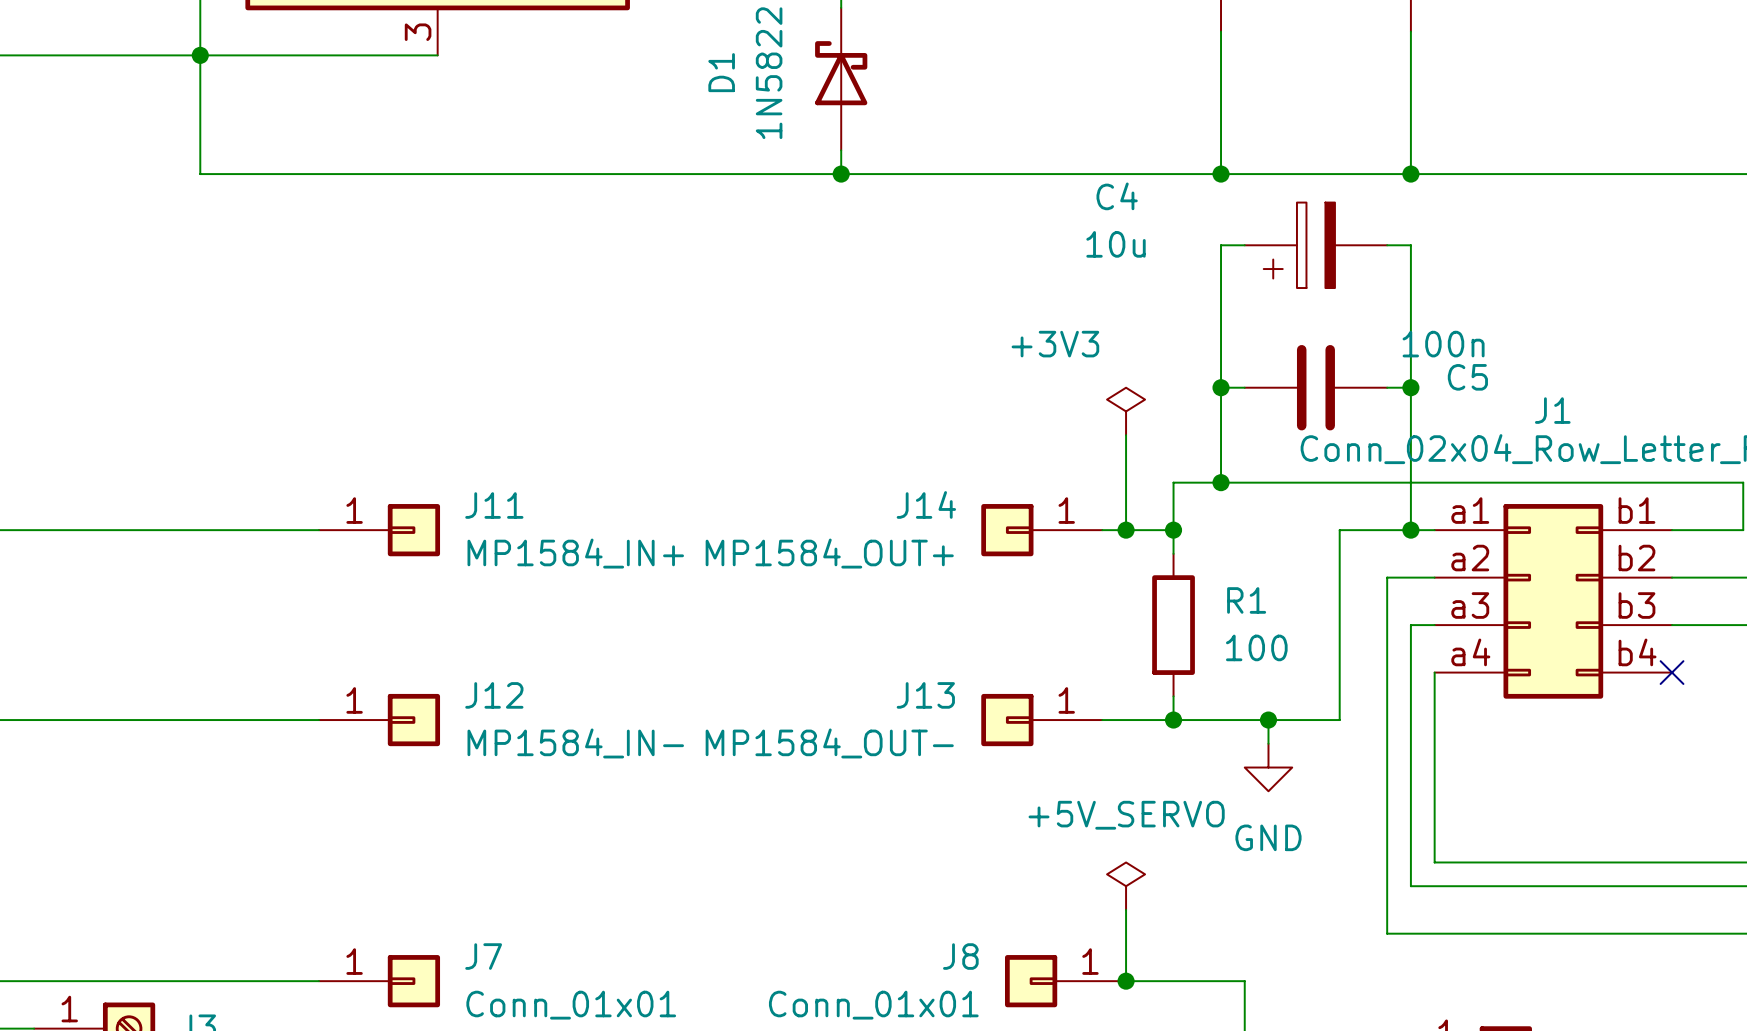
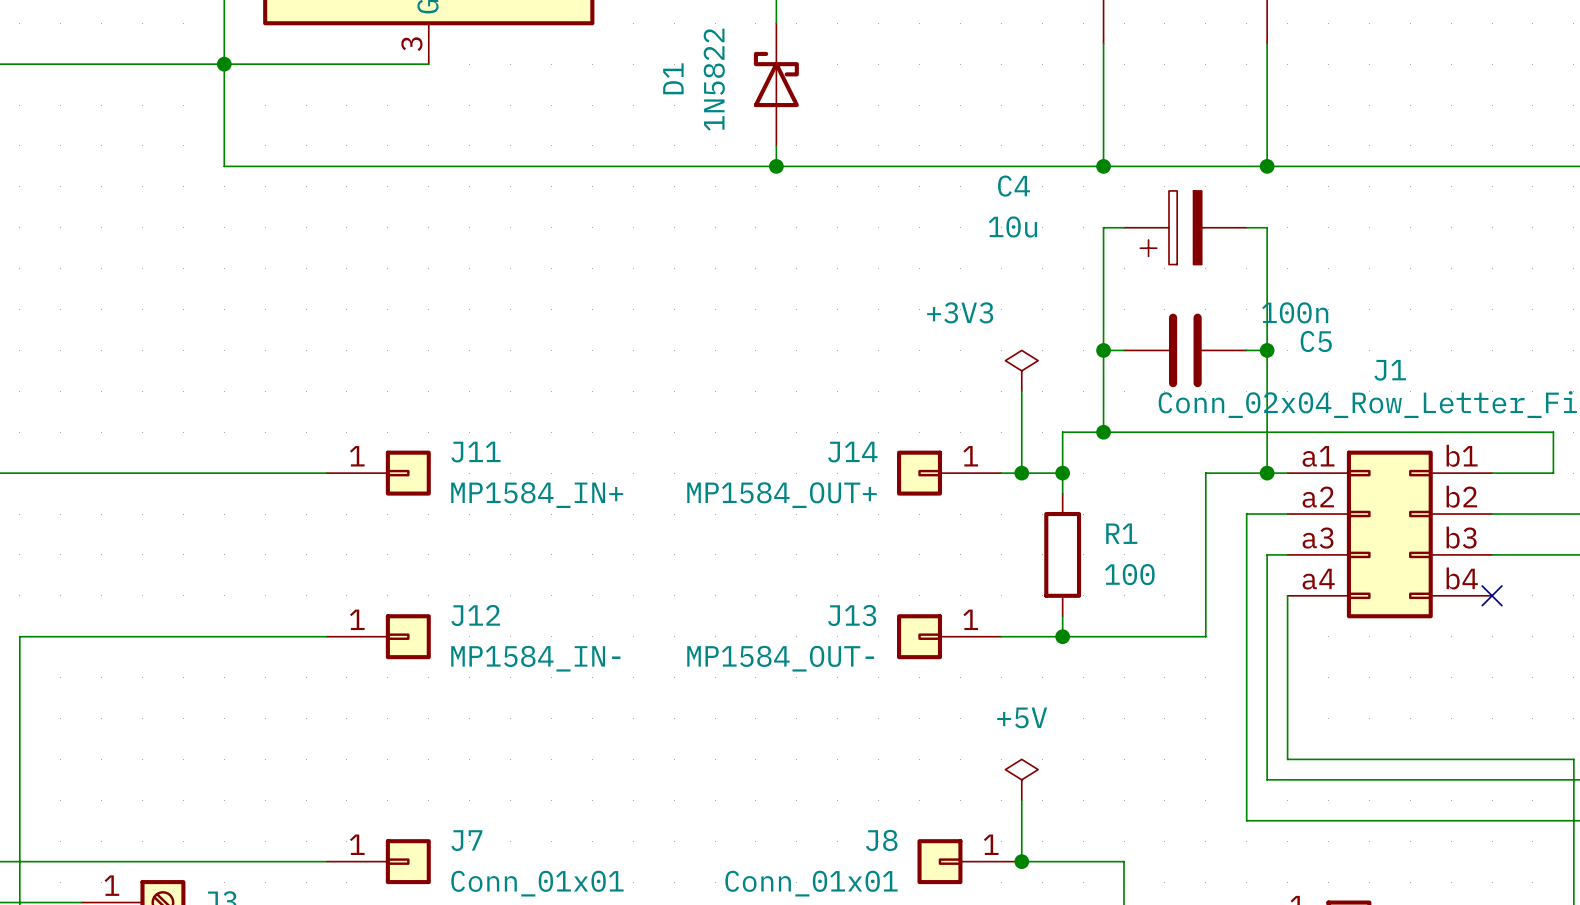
wire: (1268, 720) (1268, 743) -> none
junction: (1268, 720) -> none
power symbol: GND (1268, 767) -> none
power symbol: +5V_SERVO (1126, 886) -> +5V (1021, 779)

